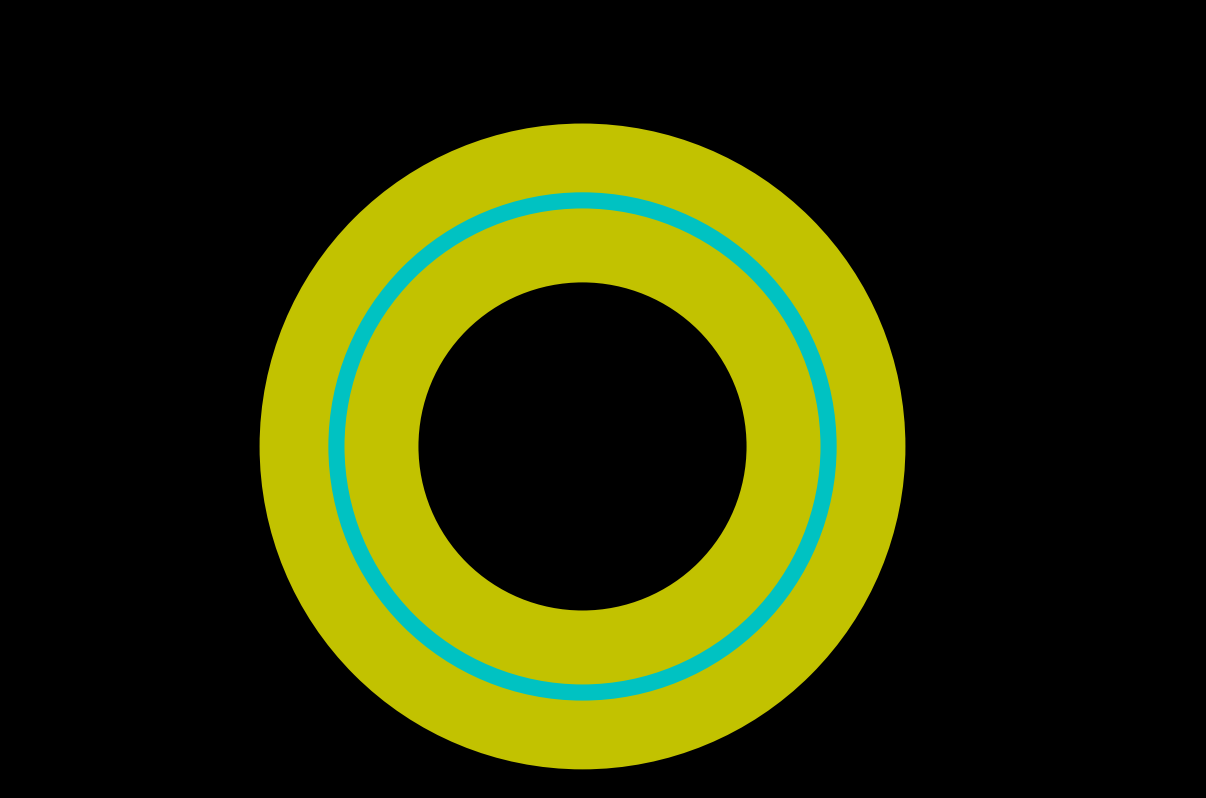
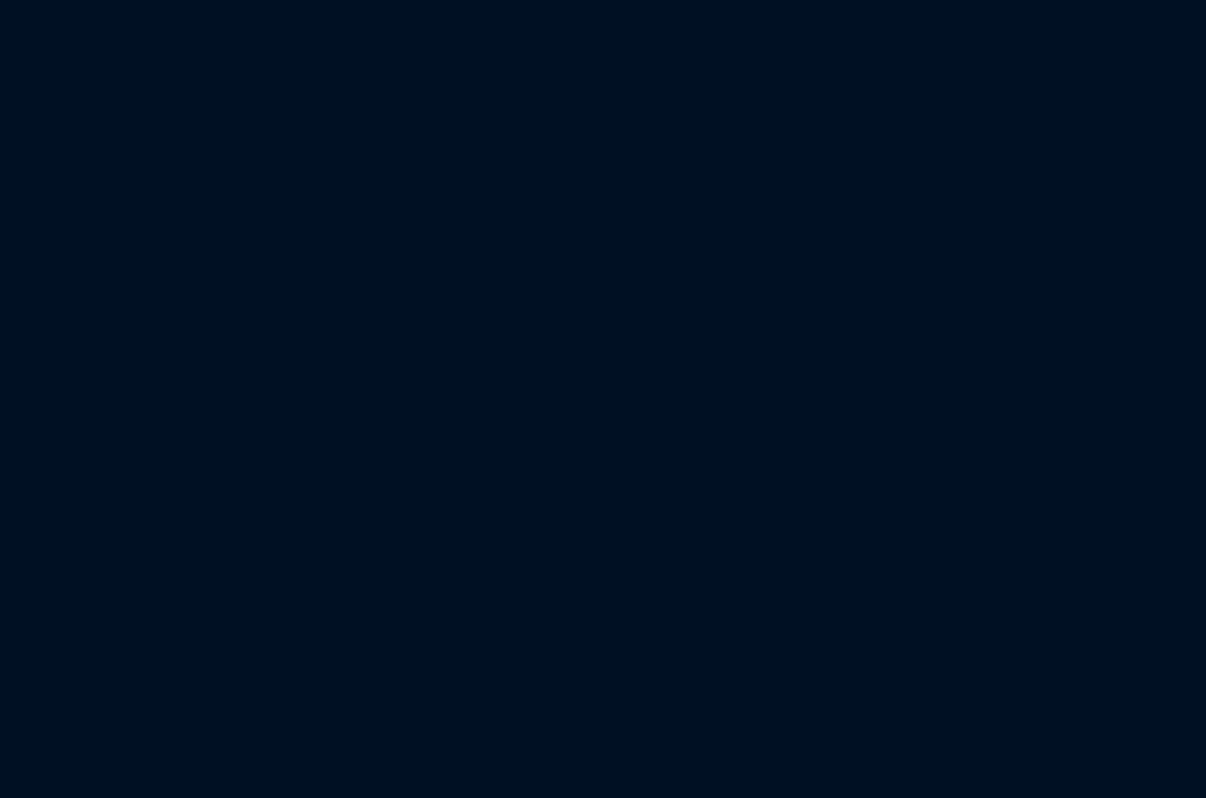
part: (582, 446) -> none

